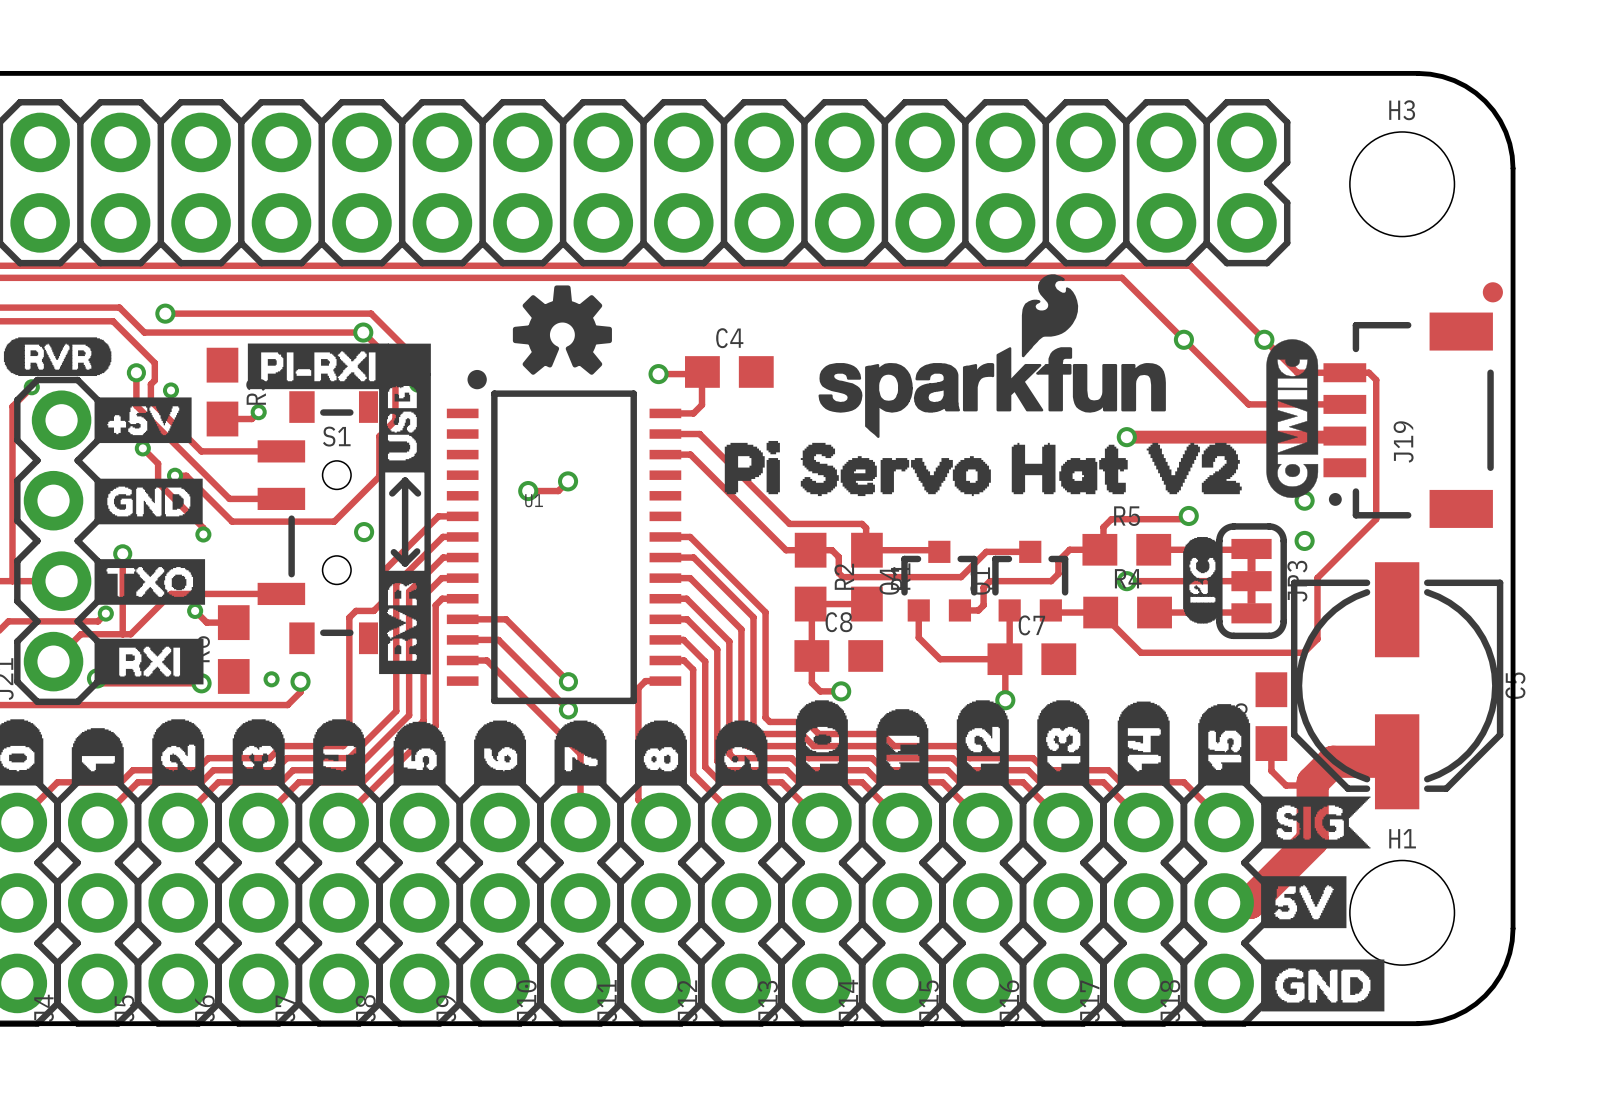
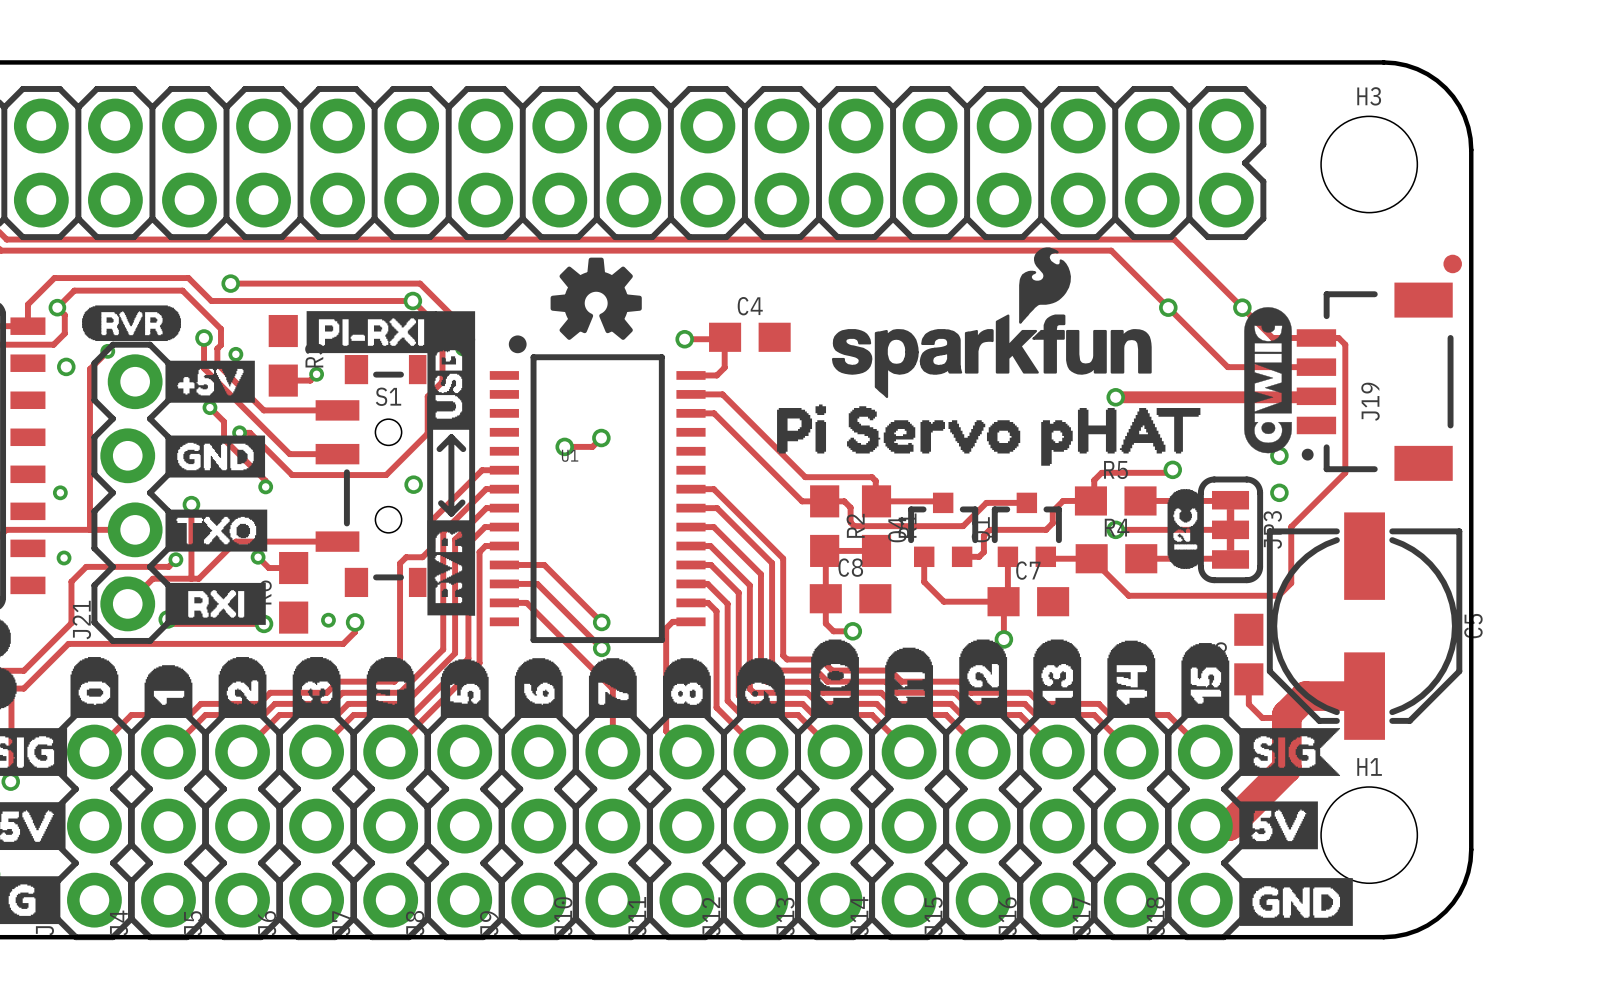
drawing shape: [724, 440, 1242, 497] -> [777, 404, 1201, 466]

